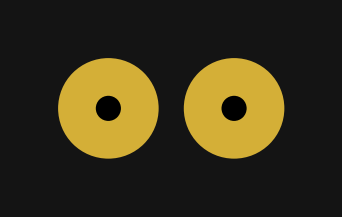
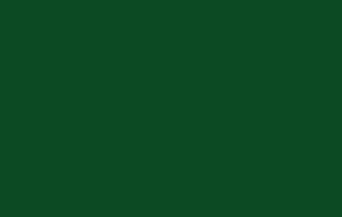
part: (108, 108) -> none
part: (234, 108) -> none

